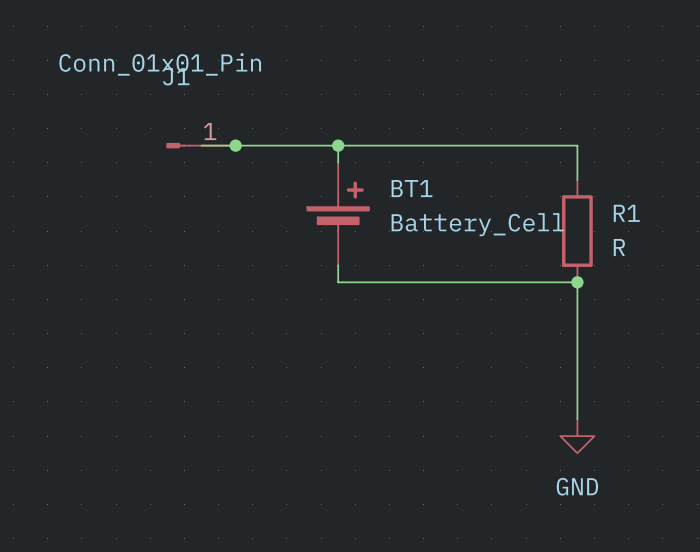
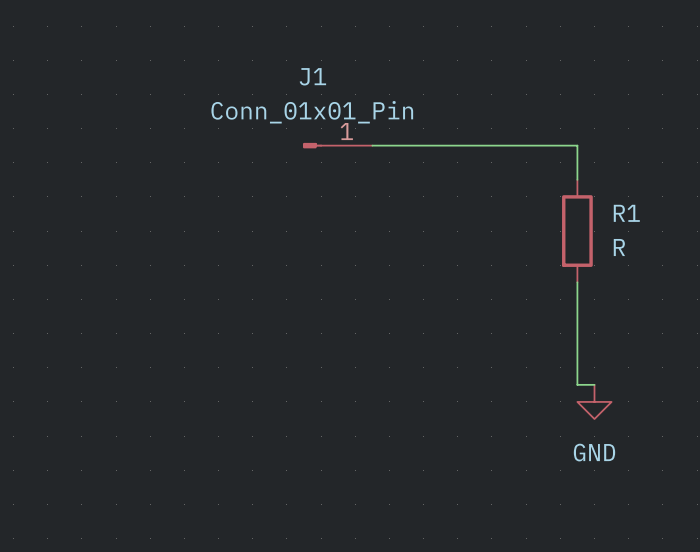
J1 value position: Conn_01x01_Pin (160, 64) -> Conn_01x01_Pin (312, 112)
J1 position: (200, 145) -> (337, 145)
wire: (201, 145) (372, 145) -> none
junction: (235, 145) -> none
wire: (338, 145) (338, 162) -> none
junction: (338, 145) -> none
BT1: Battery_Cell (338, 213) -> none
wire: (338, 265) (338, 282) (577, 282) -> none
junction: (577, 282) -> none
wire: (577, 384) (577, 419) -> (577, 384) (594, 384)
power symbol position: GND (577, 436) -> GND (594, 401)

